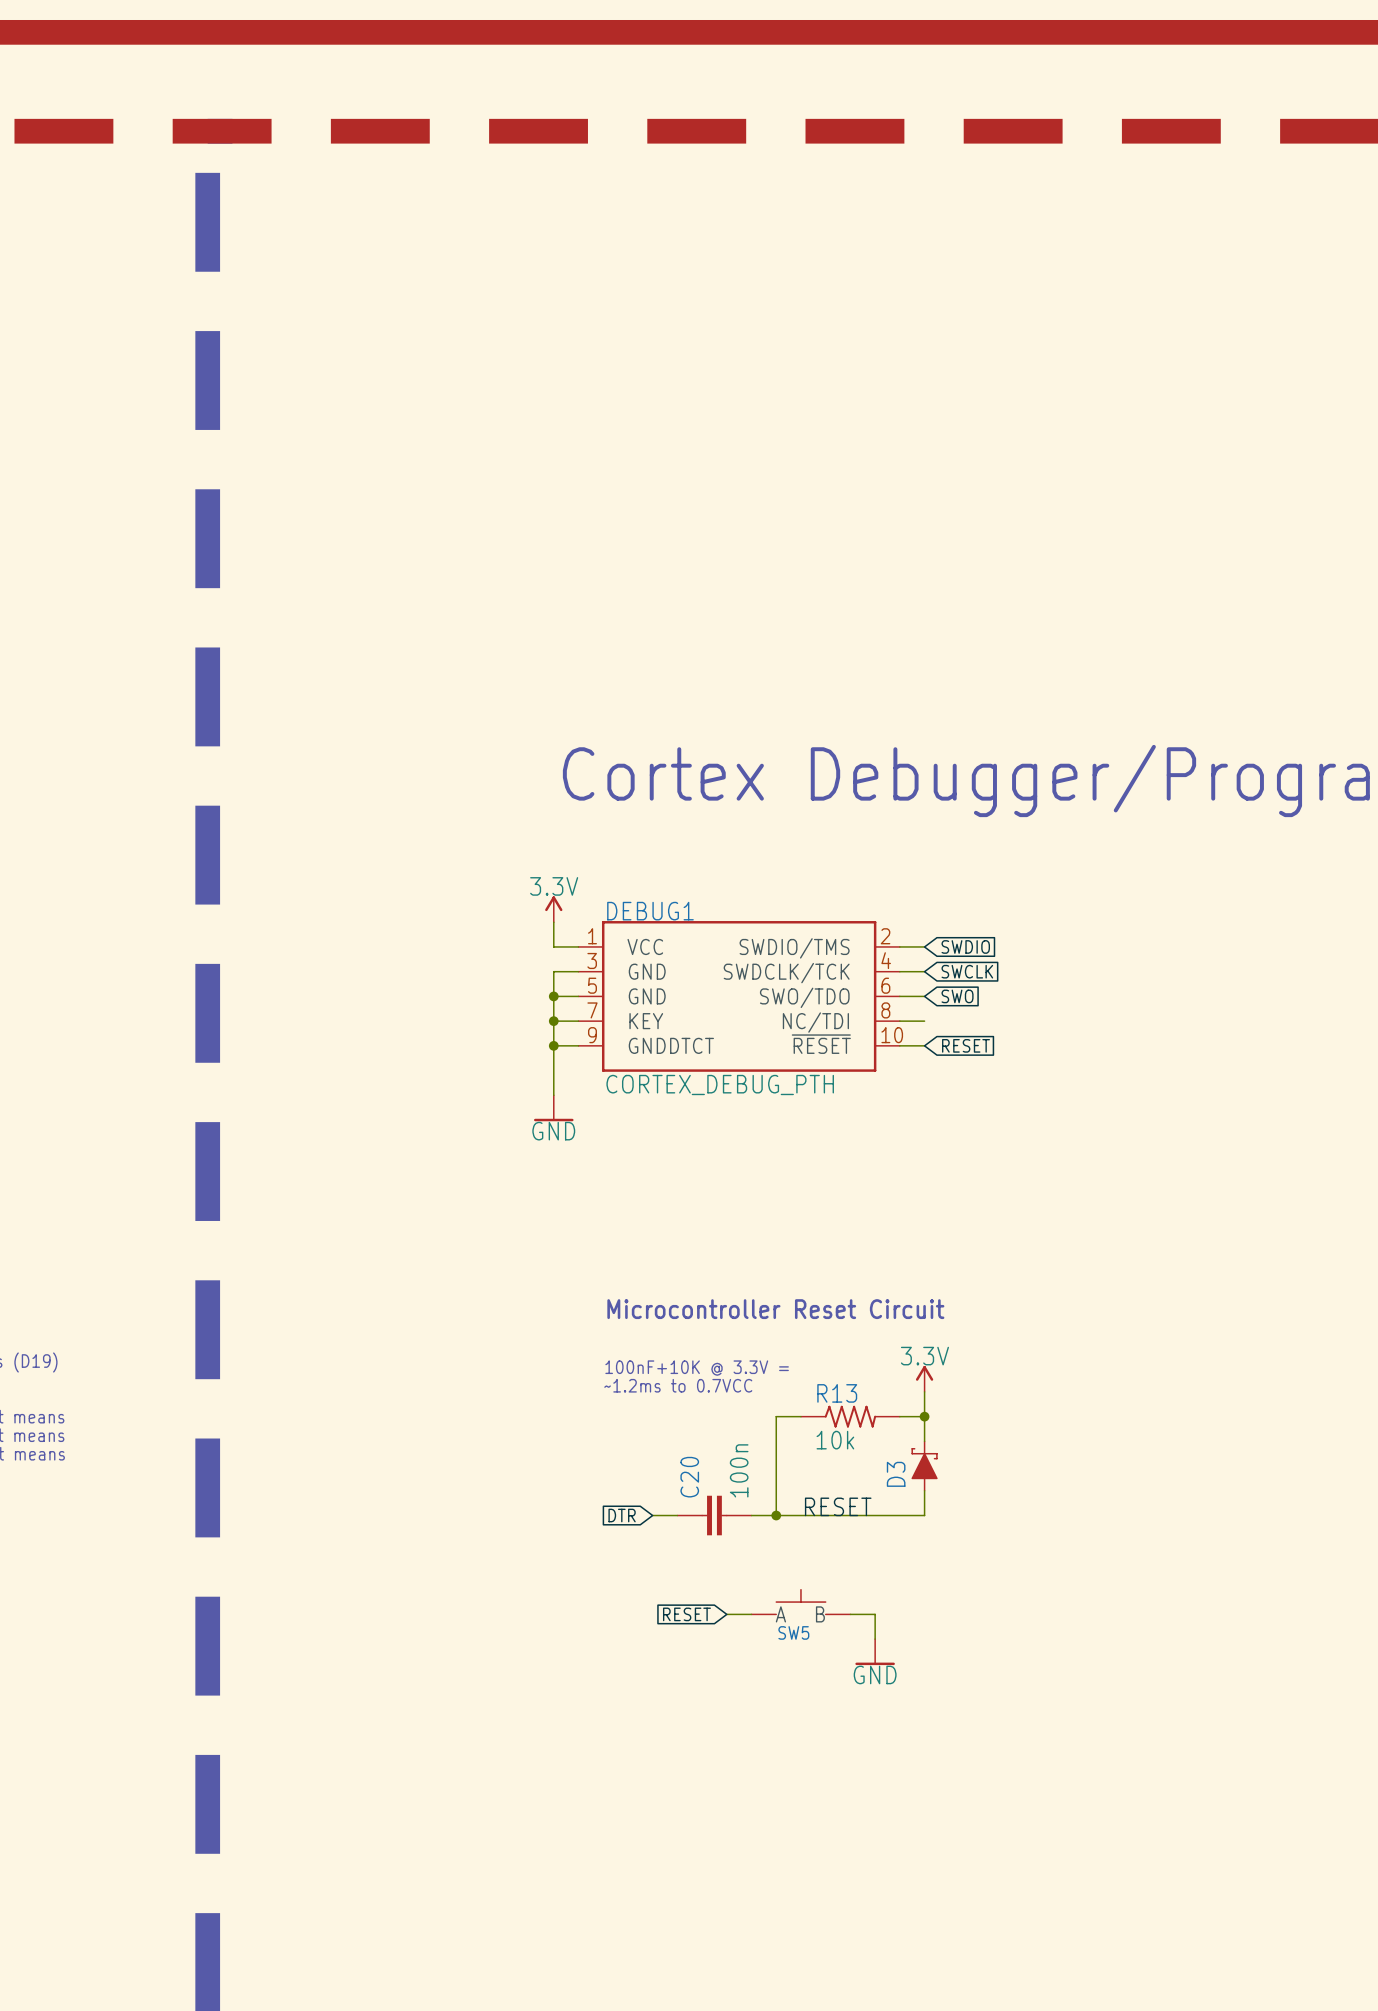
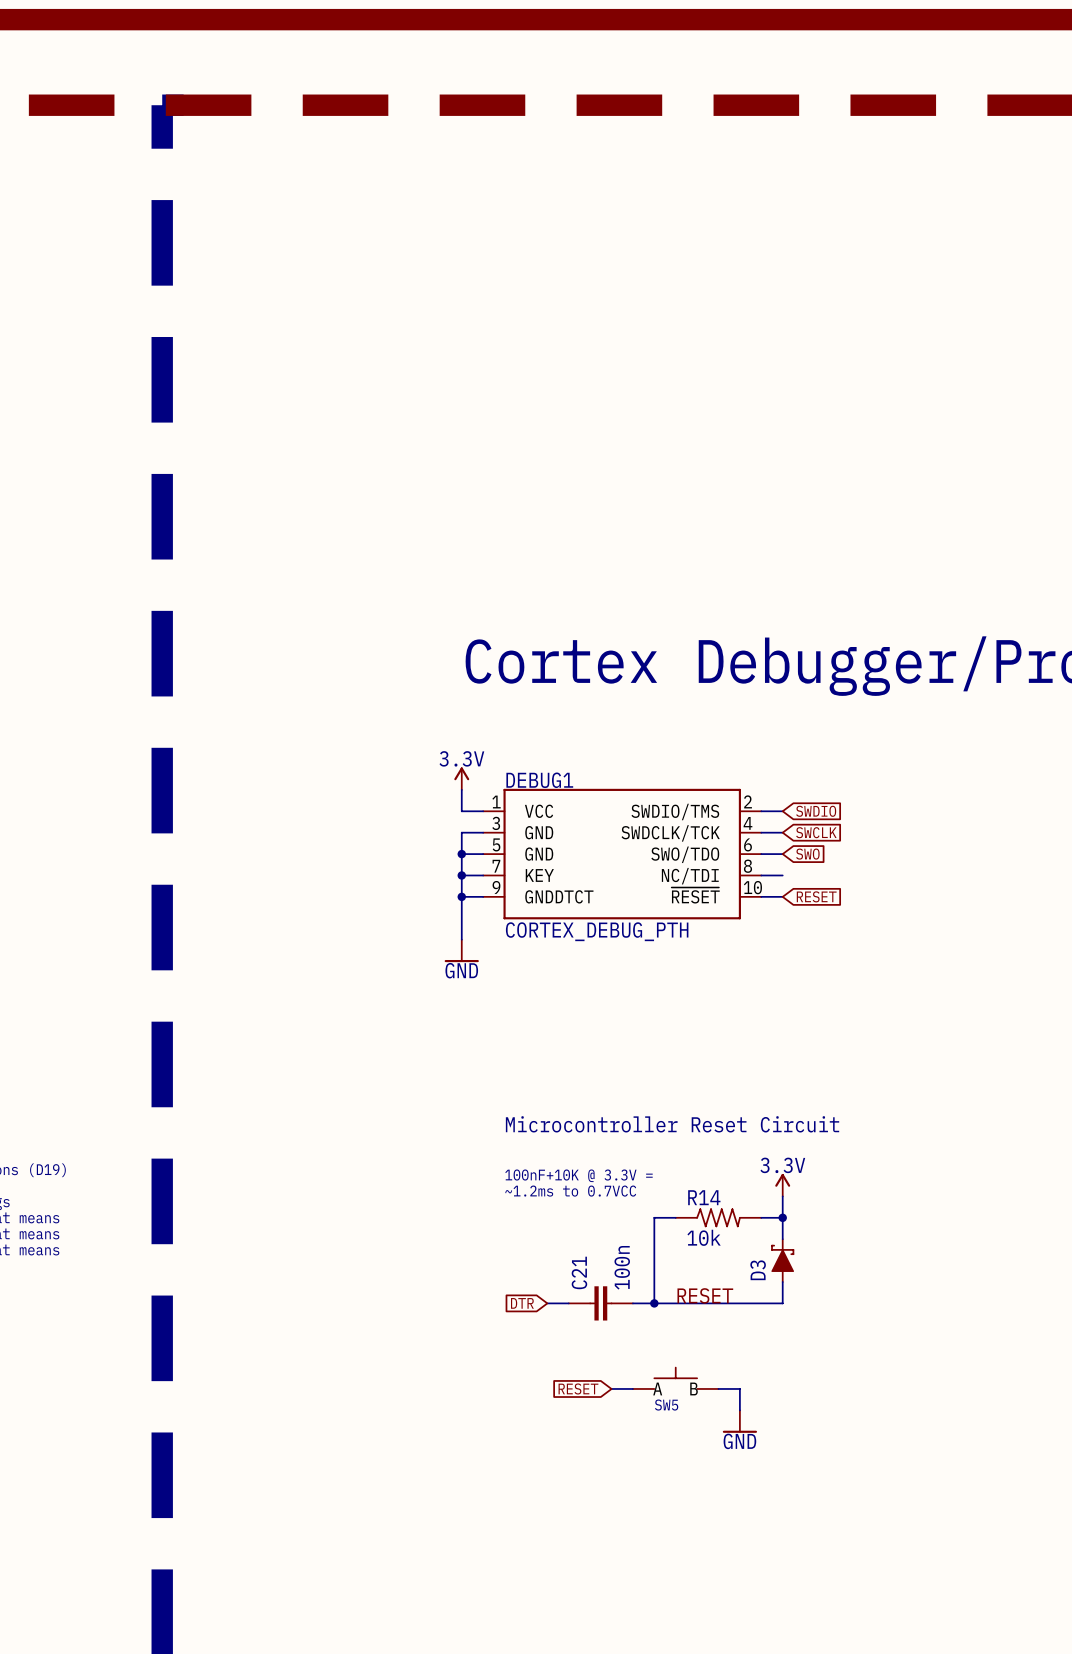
R13 name: R13 (837, 1393) -> R14 (704, 1197)
C20 name: C20 (689, 1477) -> C21 (579, 1272)

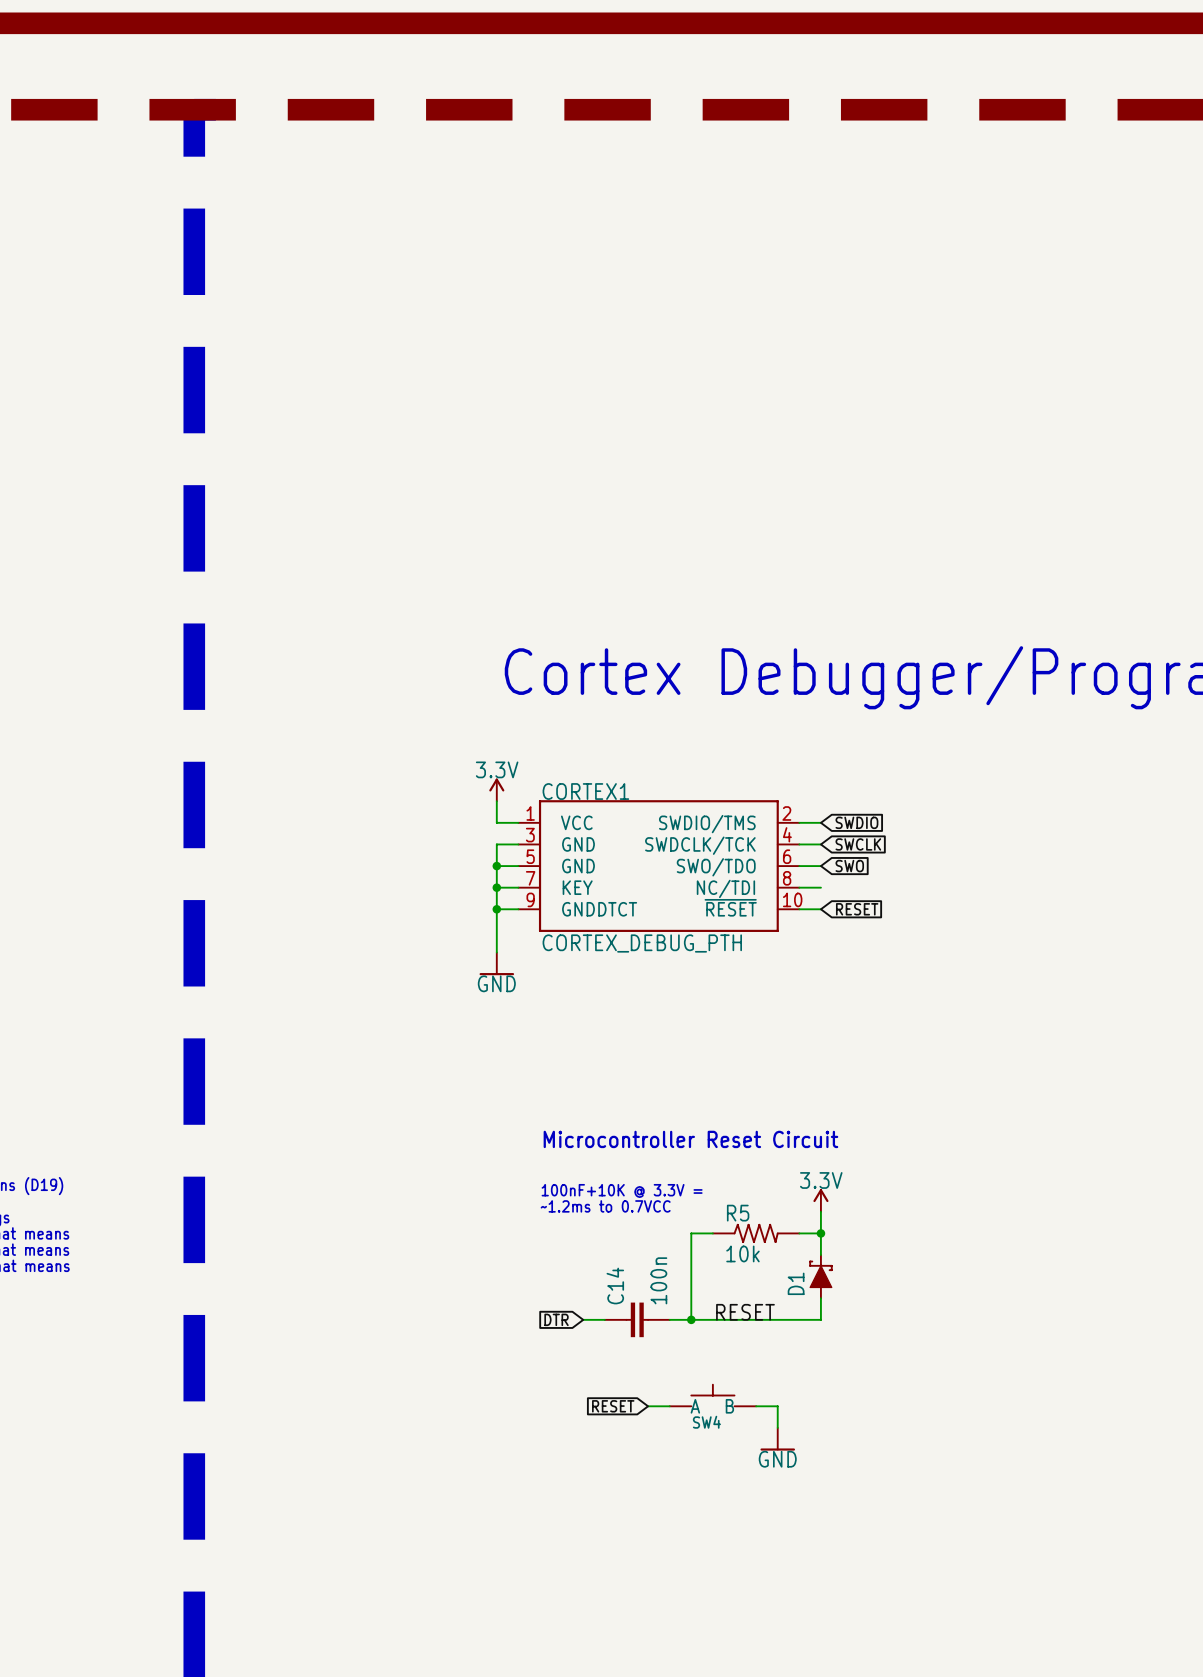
DEBUG1 name: DEBUG1 (539, 780) -> CORTEX1 (585, 791)
R14 name: R14 (704, 1197) -> R5 (738, 1213)
D3 name: D3 (758, 1270) -> D1 (796, 1283)
C21 name: C21 (579, 1272) -> C14 (615, 1286)
SW5 name: SW5 (666, 1405) -> SW4 (706, 1422)

